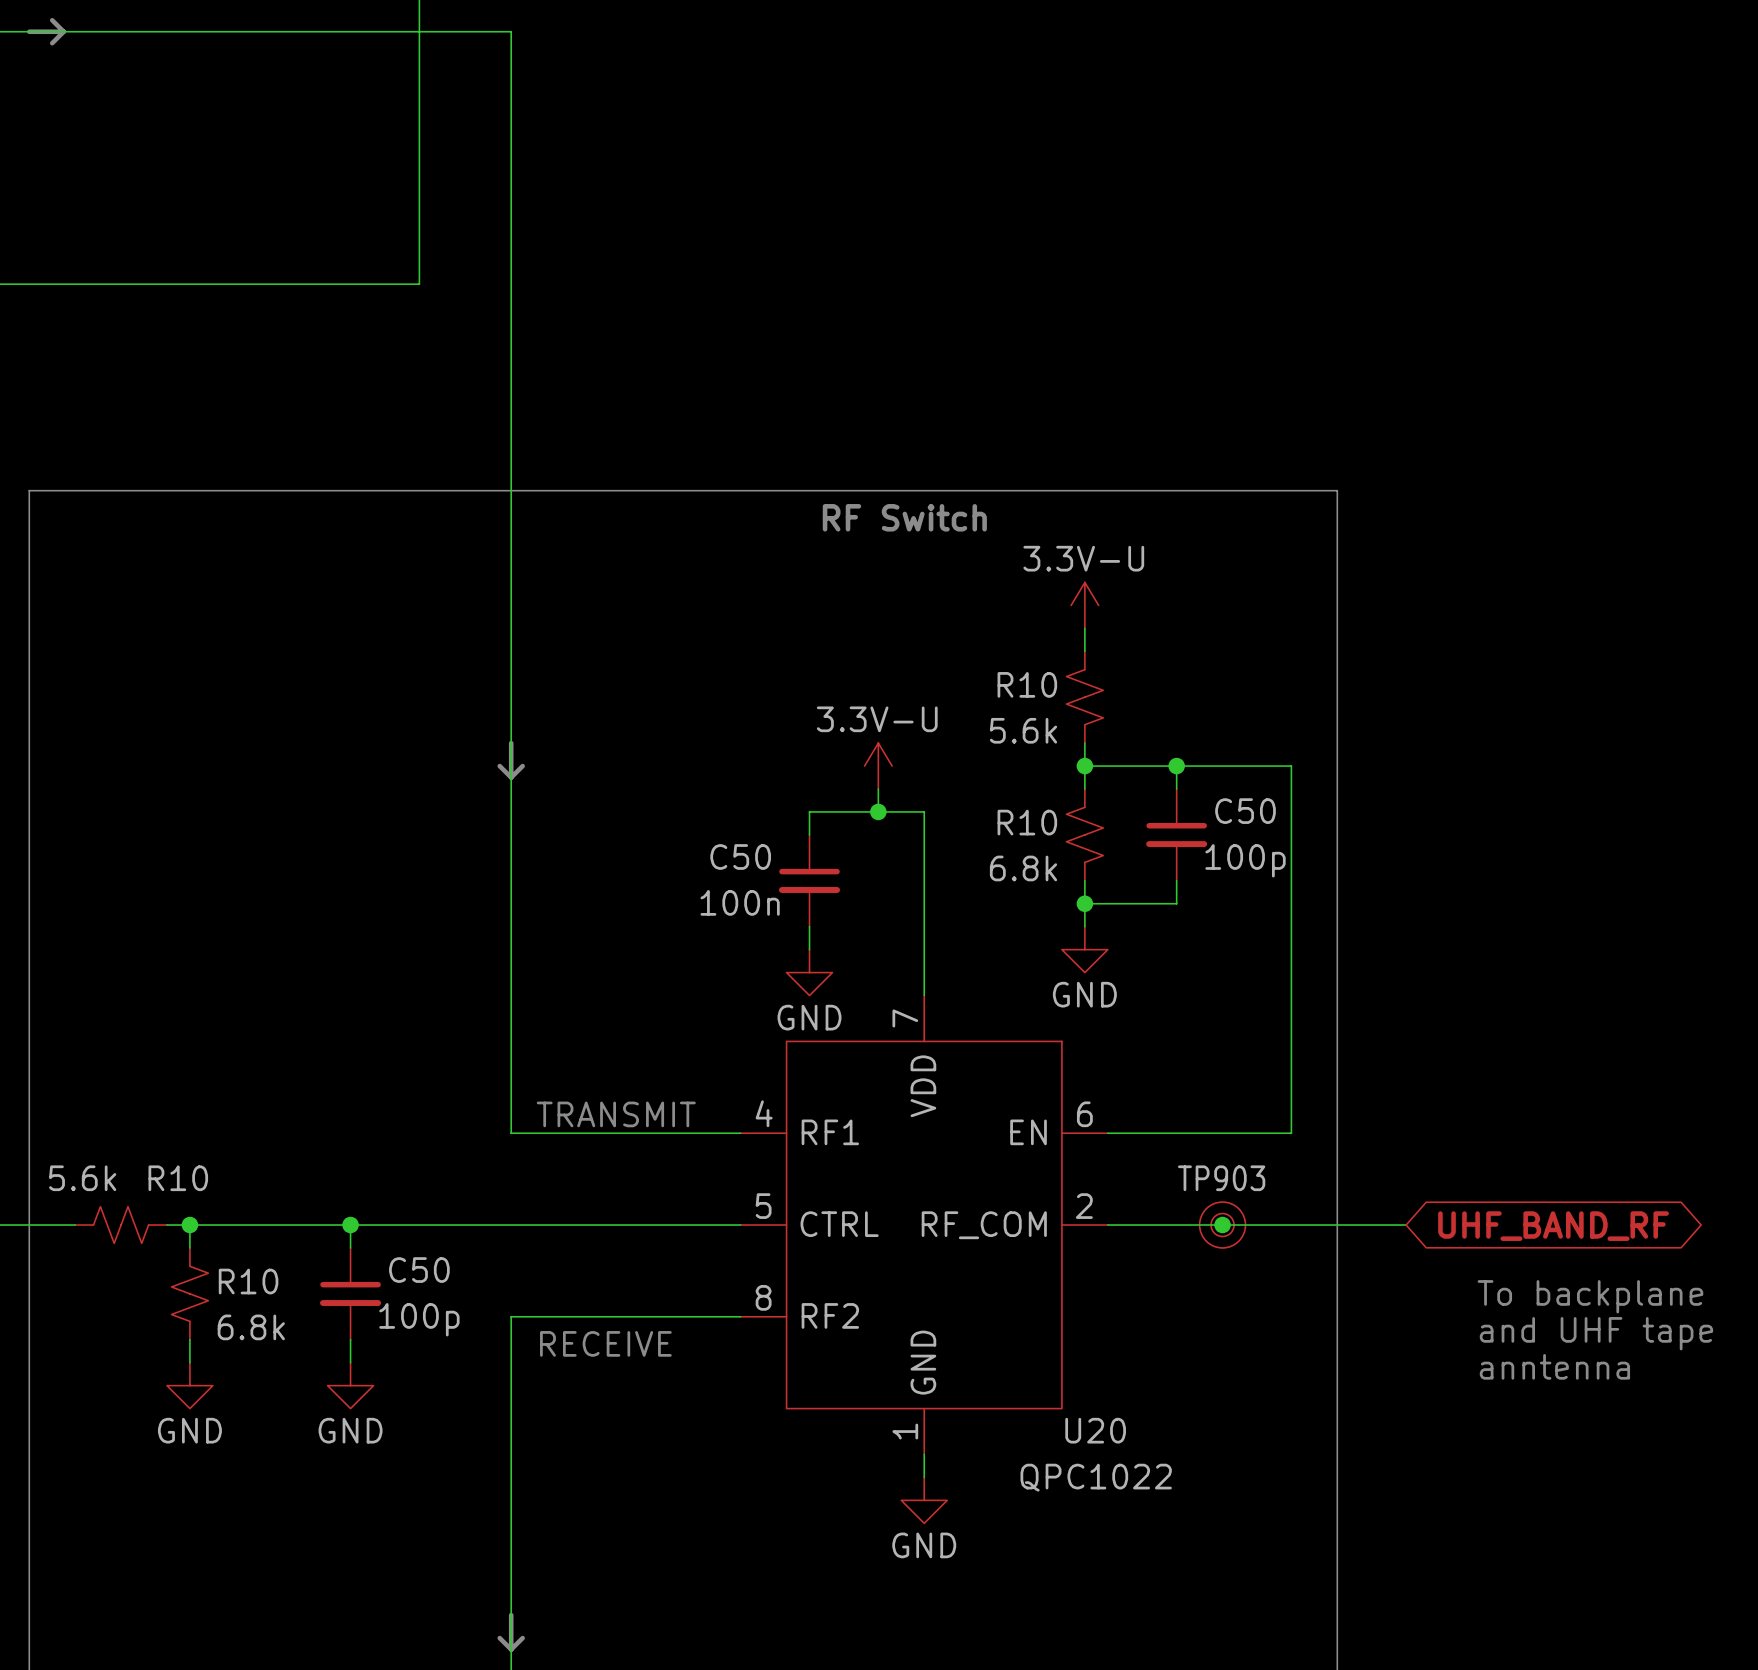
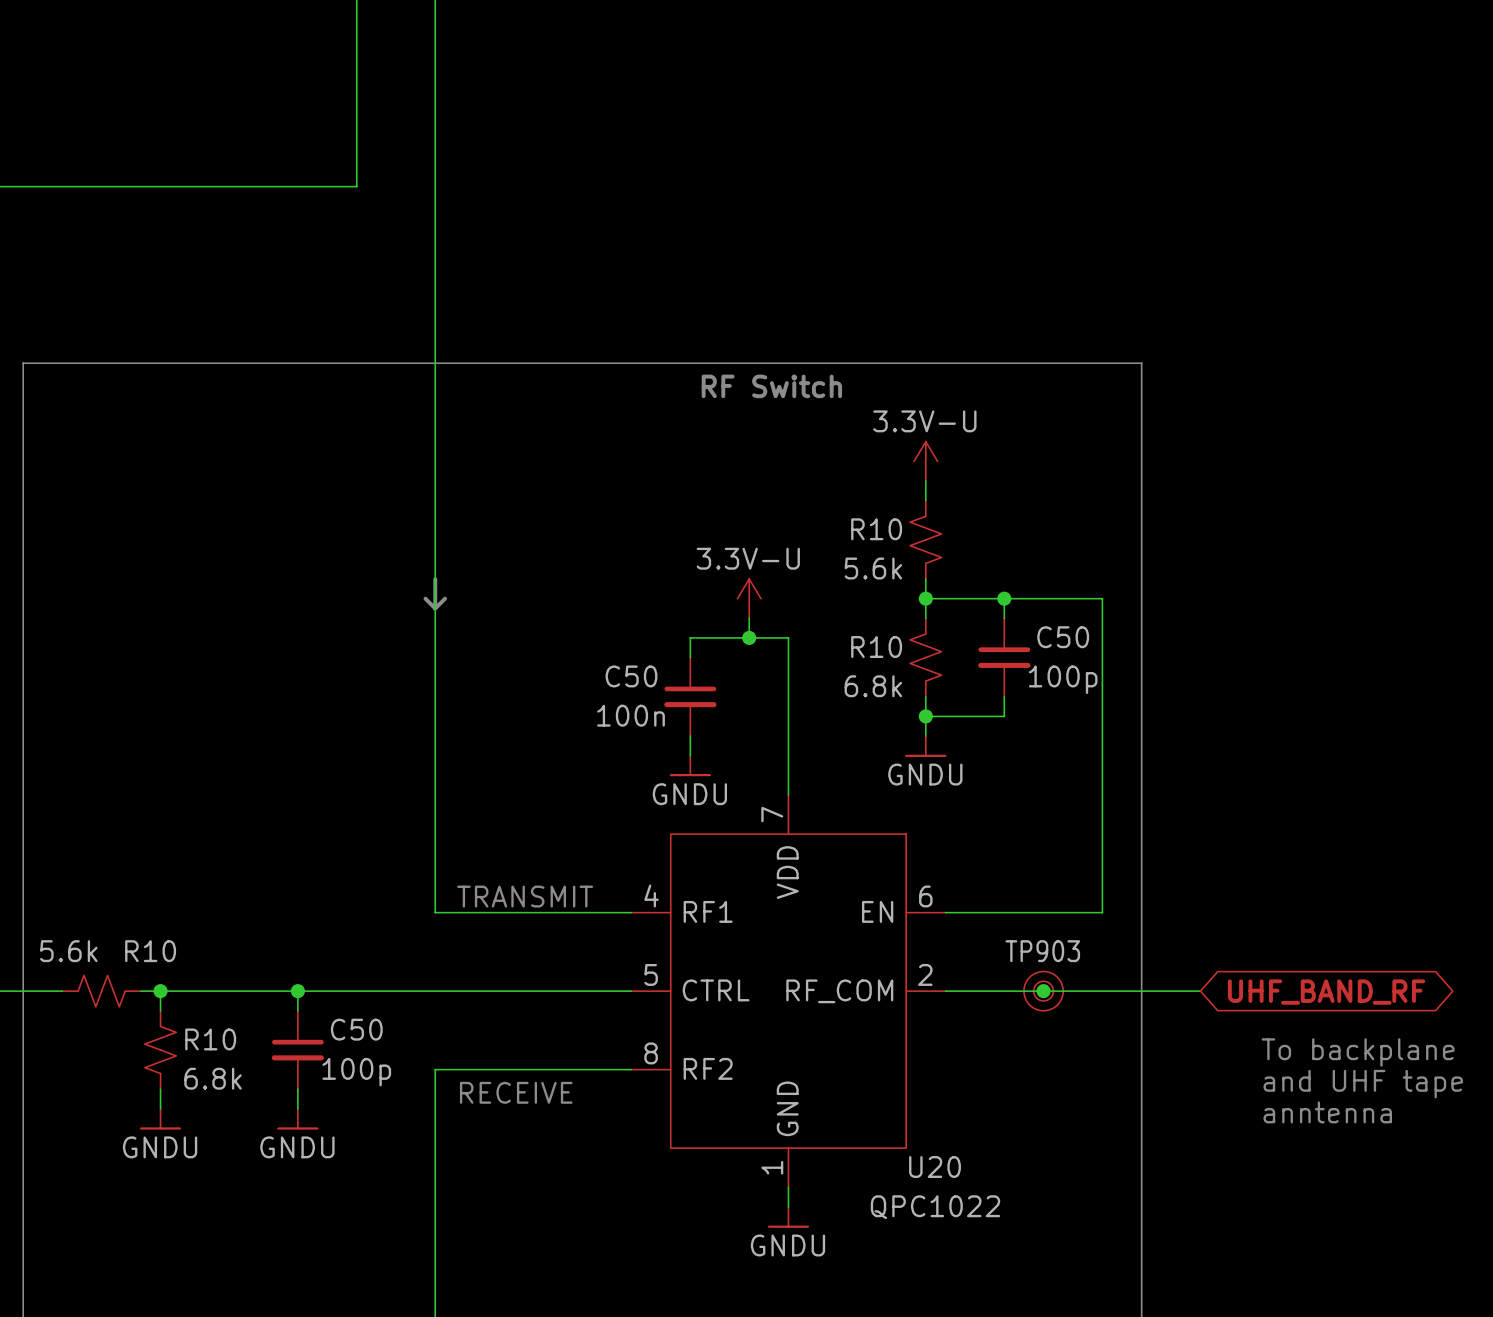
power symbol: GND (1084, 949) -> GNDU (925, 745)
power symbol: GND (809, 972) -> GNDU (690, 765)
power symbol: GND (189, 1385) -> GNDU (160, 1118)
power symbol: GND (350, 1385) -> GNDU (297, 1118)
power symbol: GND (924, 1500) -> GNDU (788, 1216)

